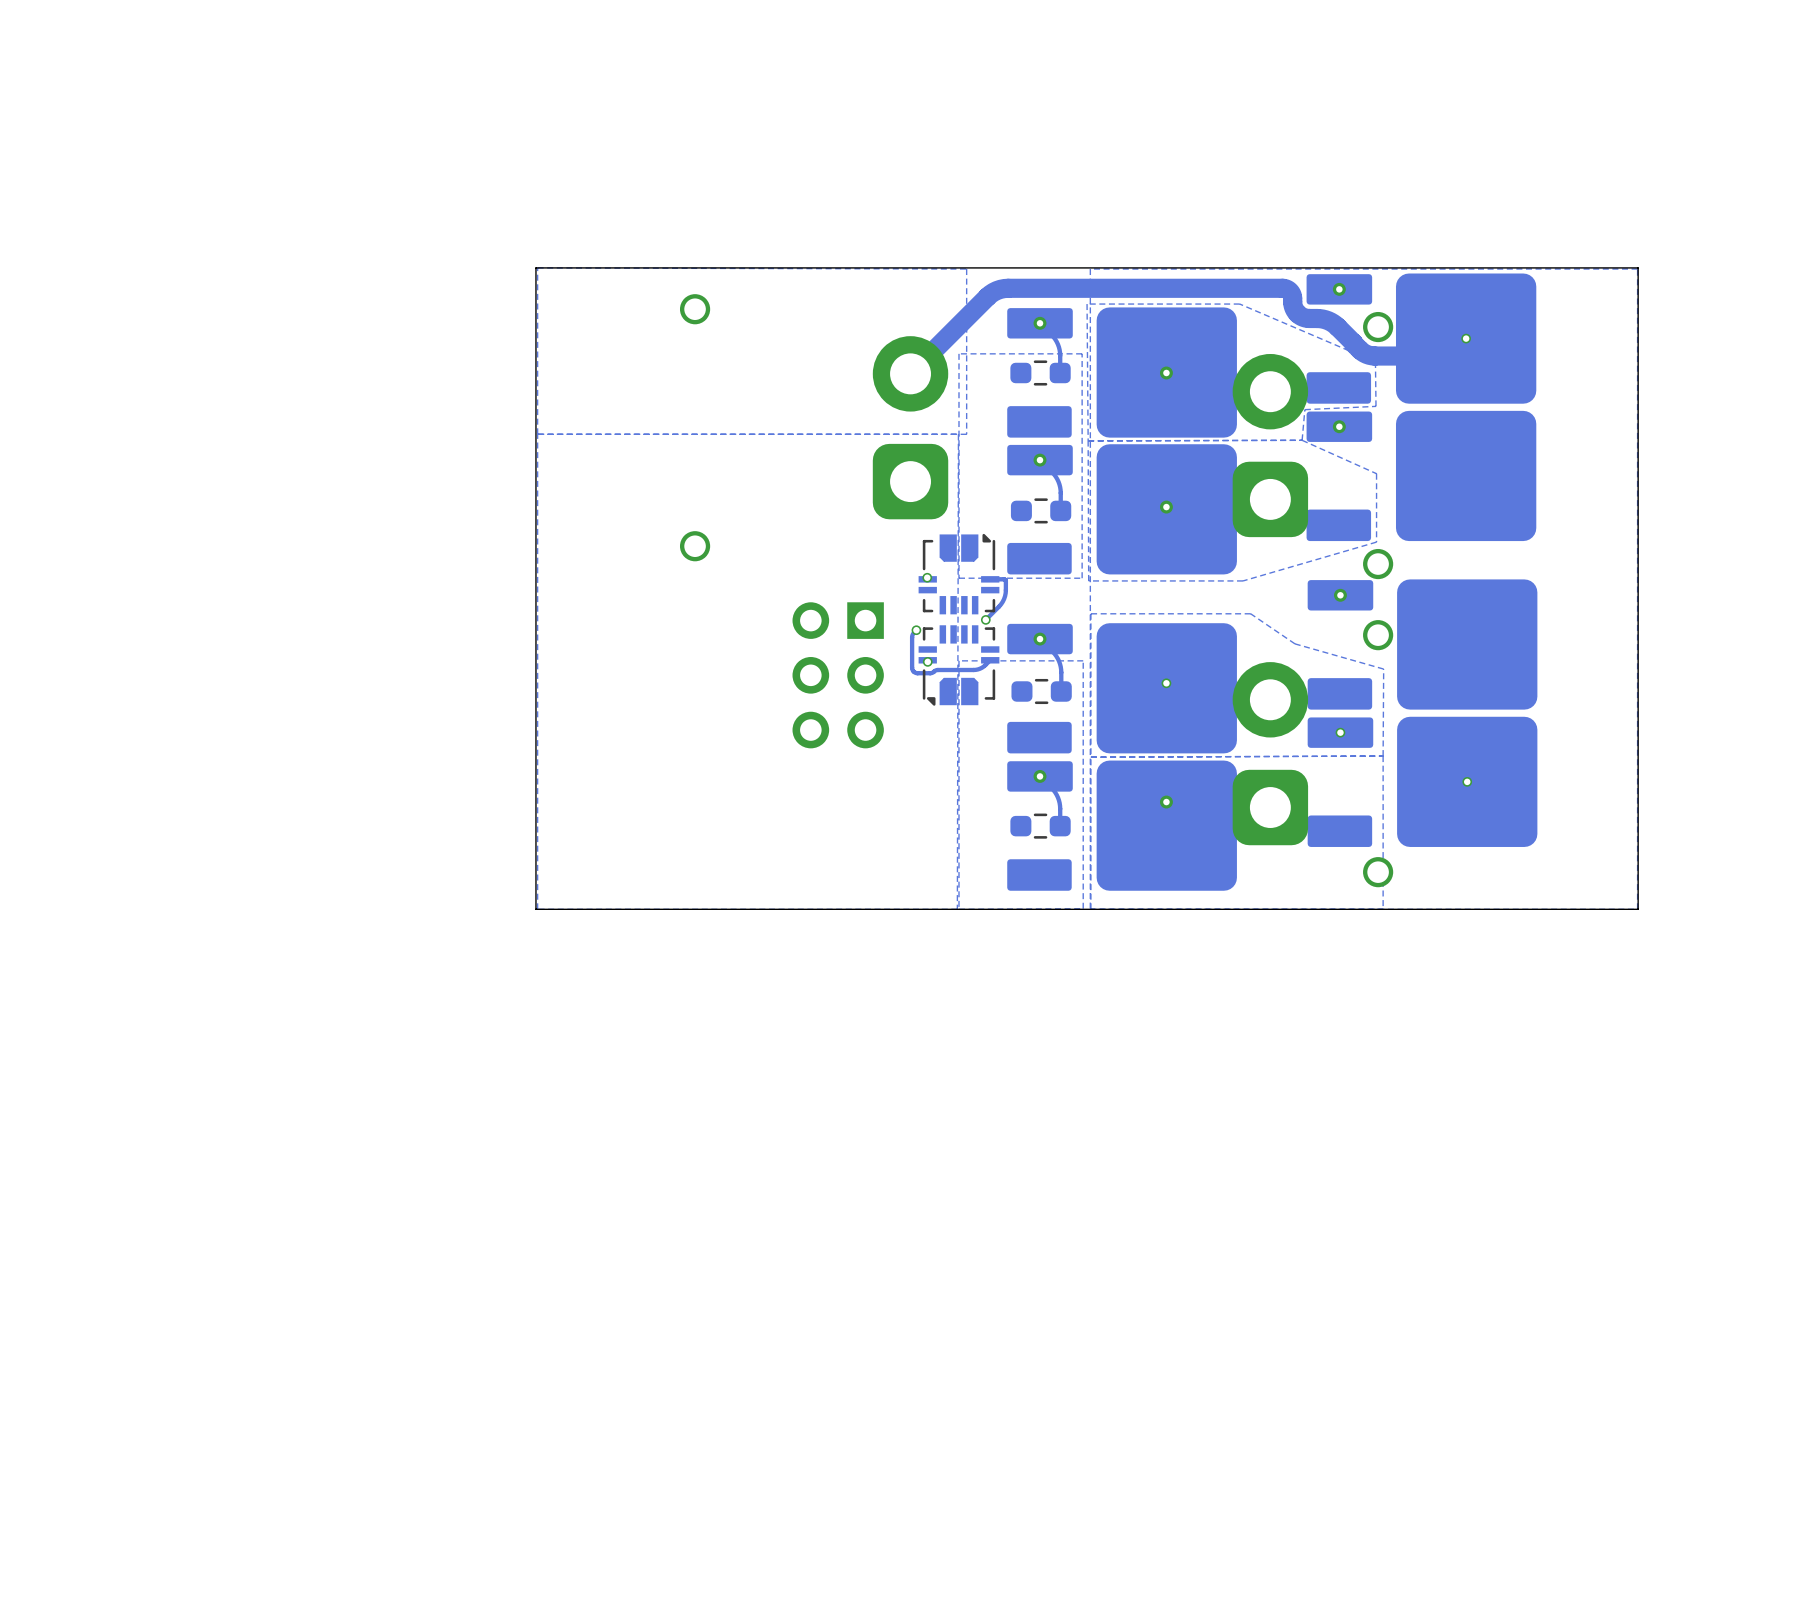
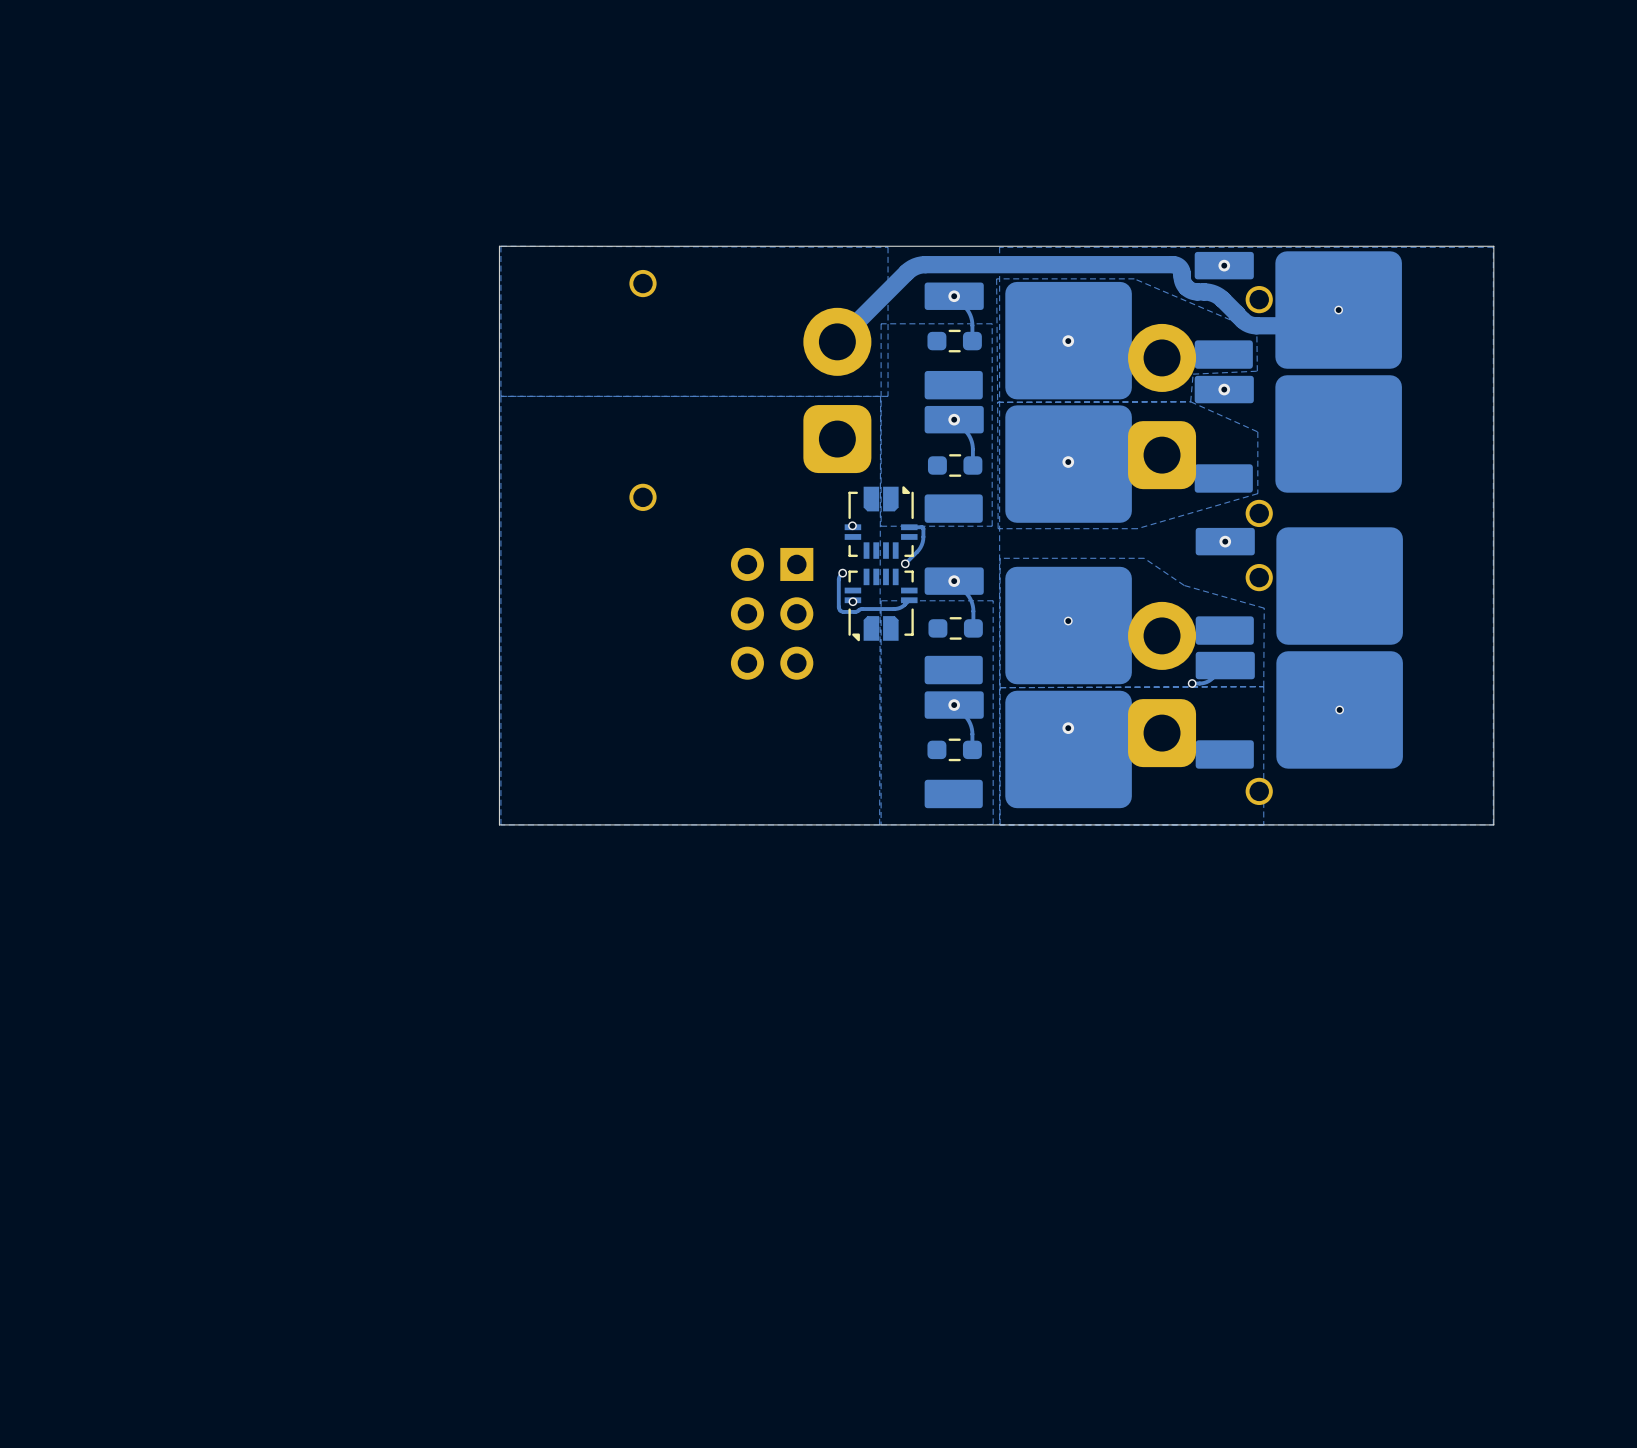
track: none -> (1225, 665) (1208, 681) (1192, 683)
via position: (1340, 732) -> (1192, 683)

